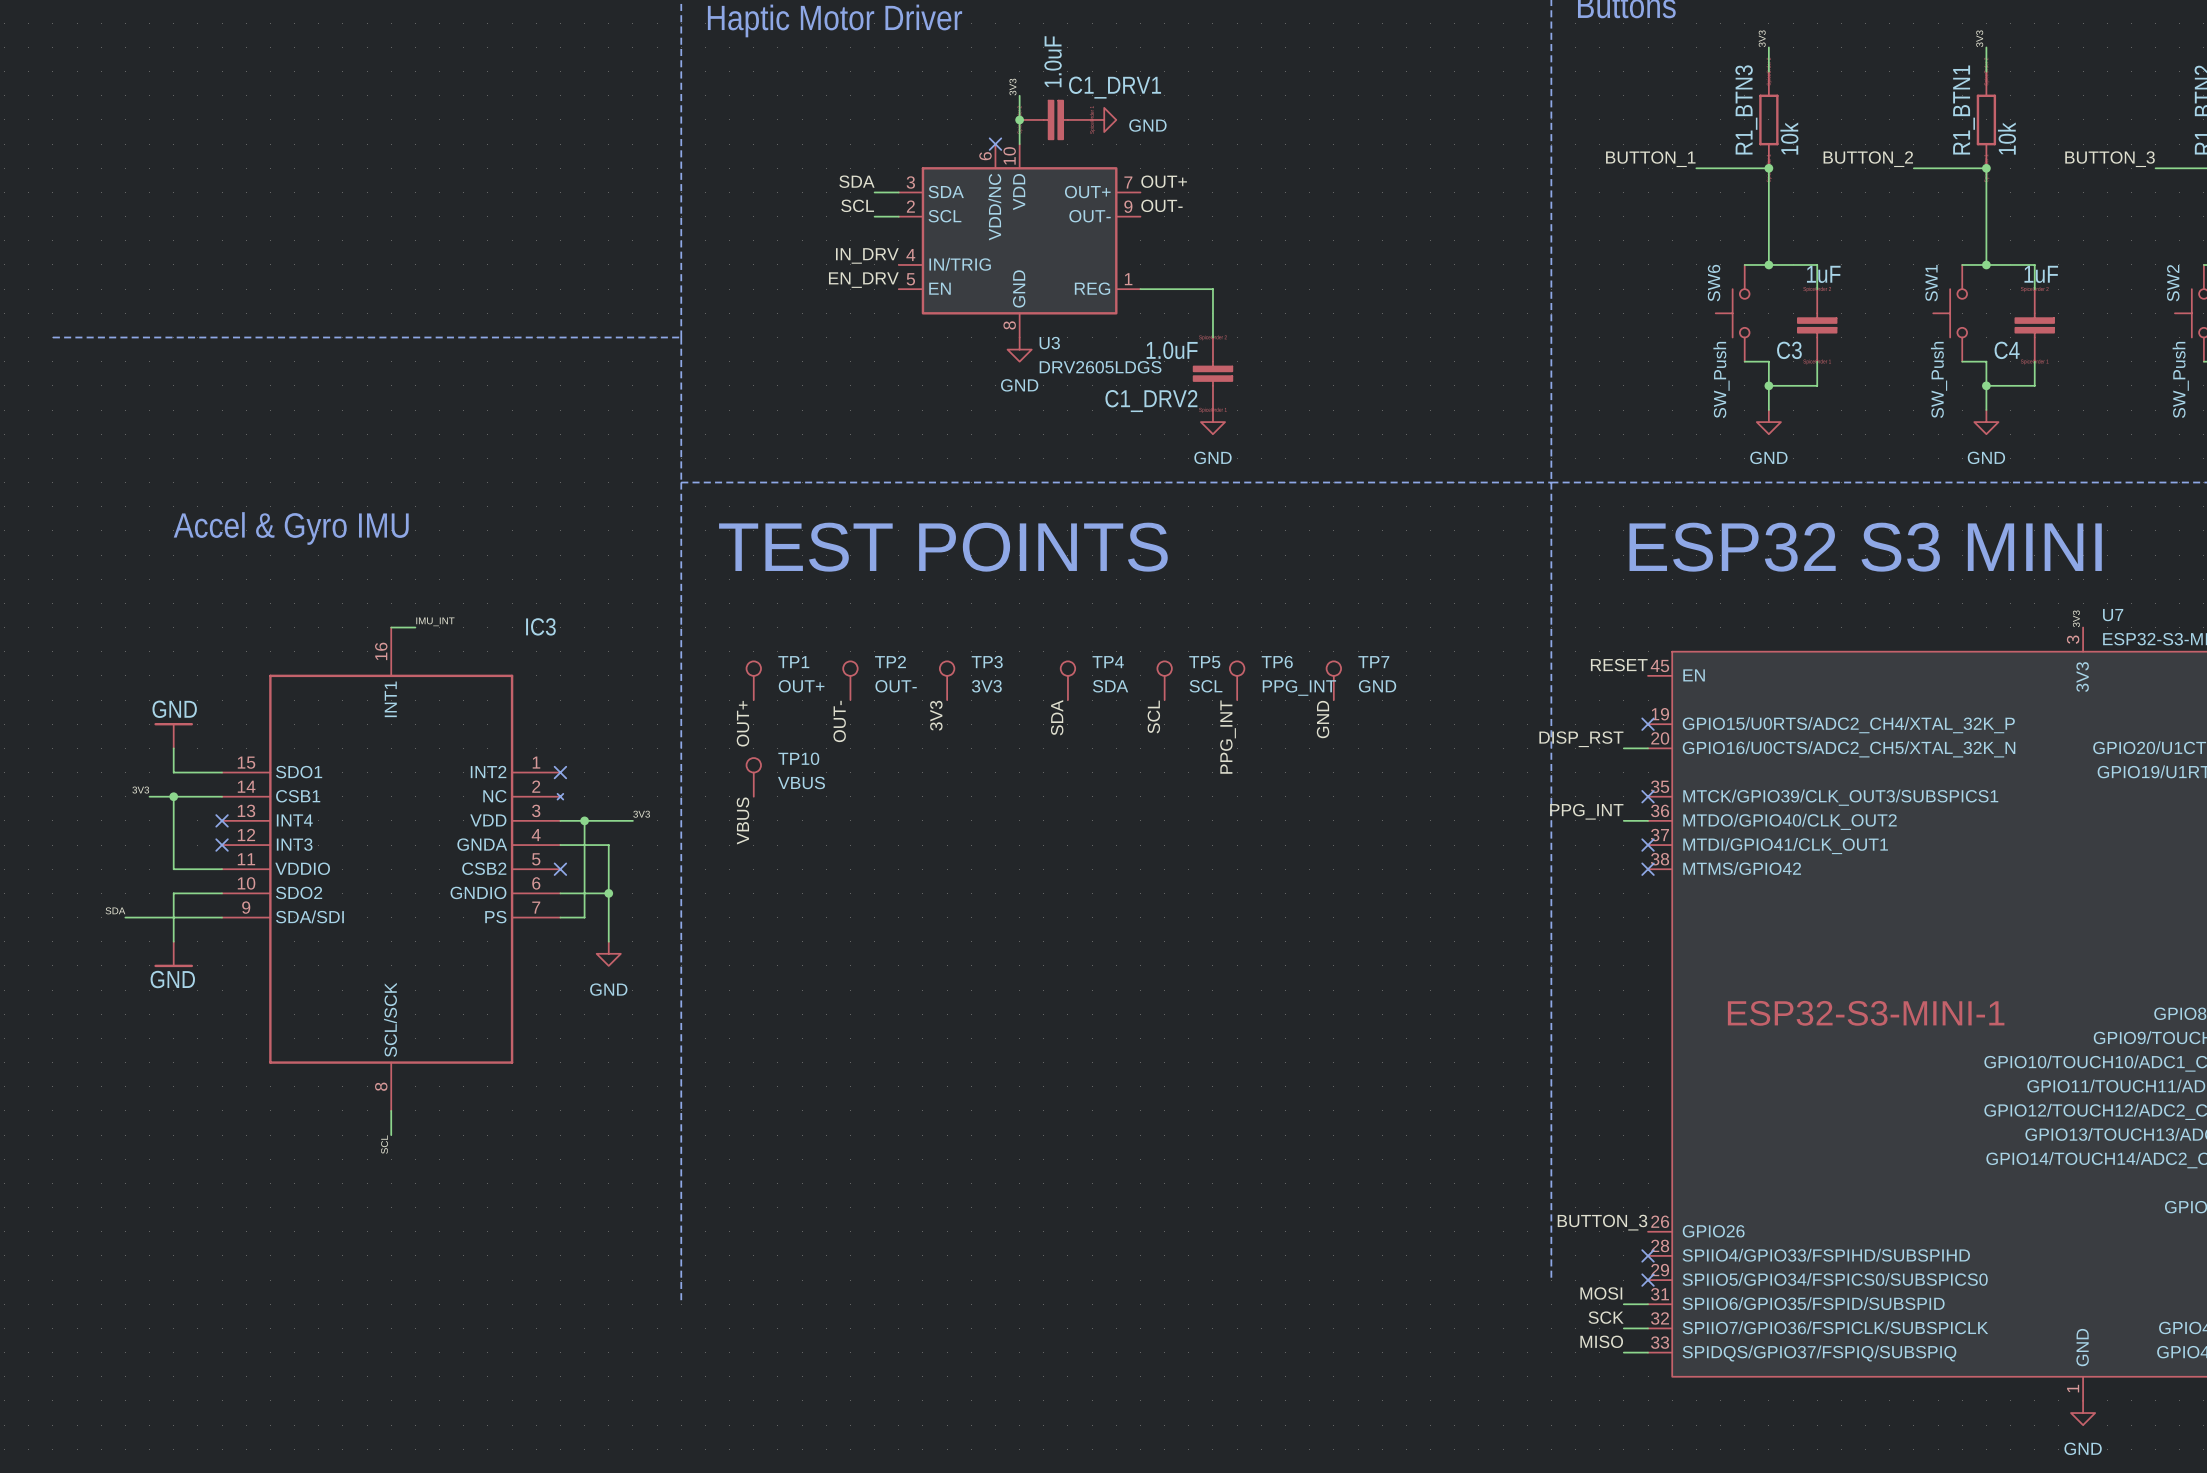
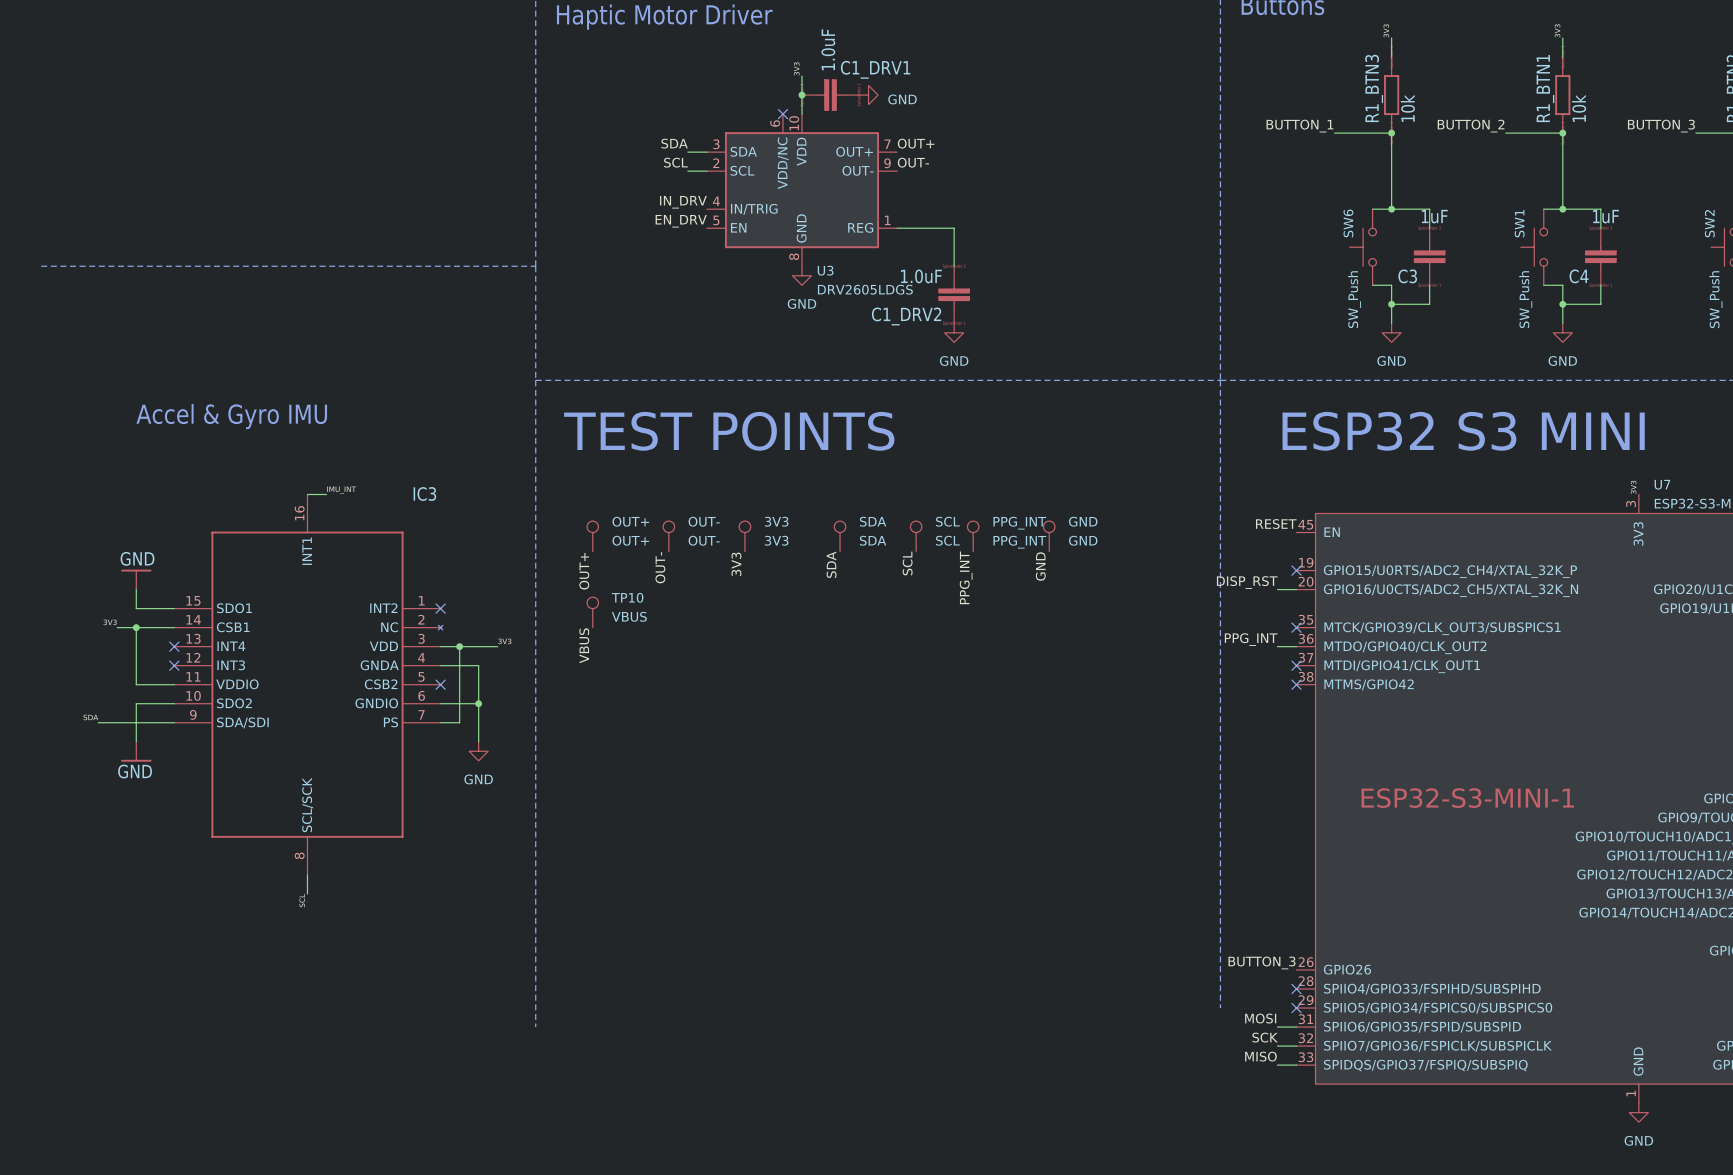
TP1 name: TP1 (793, 662) -> OUT+ (630, 521)
TP2 name: TP2 (890, 662) -> OUT- (704, 521)
TP3 name: TP3 (987, 662) -> 3V3 (776, 521)
TP4 name: TP4 (1108, 662) -> SDA (873, 521)
TP5 name: TP5 (1204, 662) -> SCL (947, 521)
TP6 name: TP6 (1277, 662) -> PPG_INT (1019, 523)
TP7 name: TP7 (1373, 662) -> GND (1083, 521)

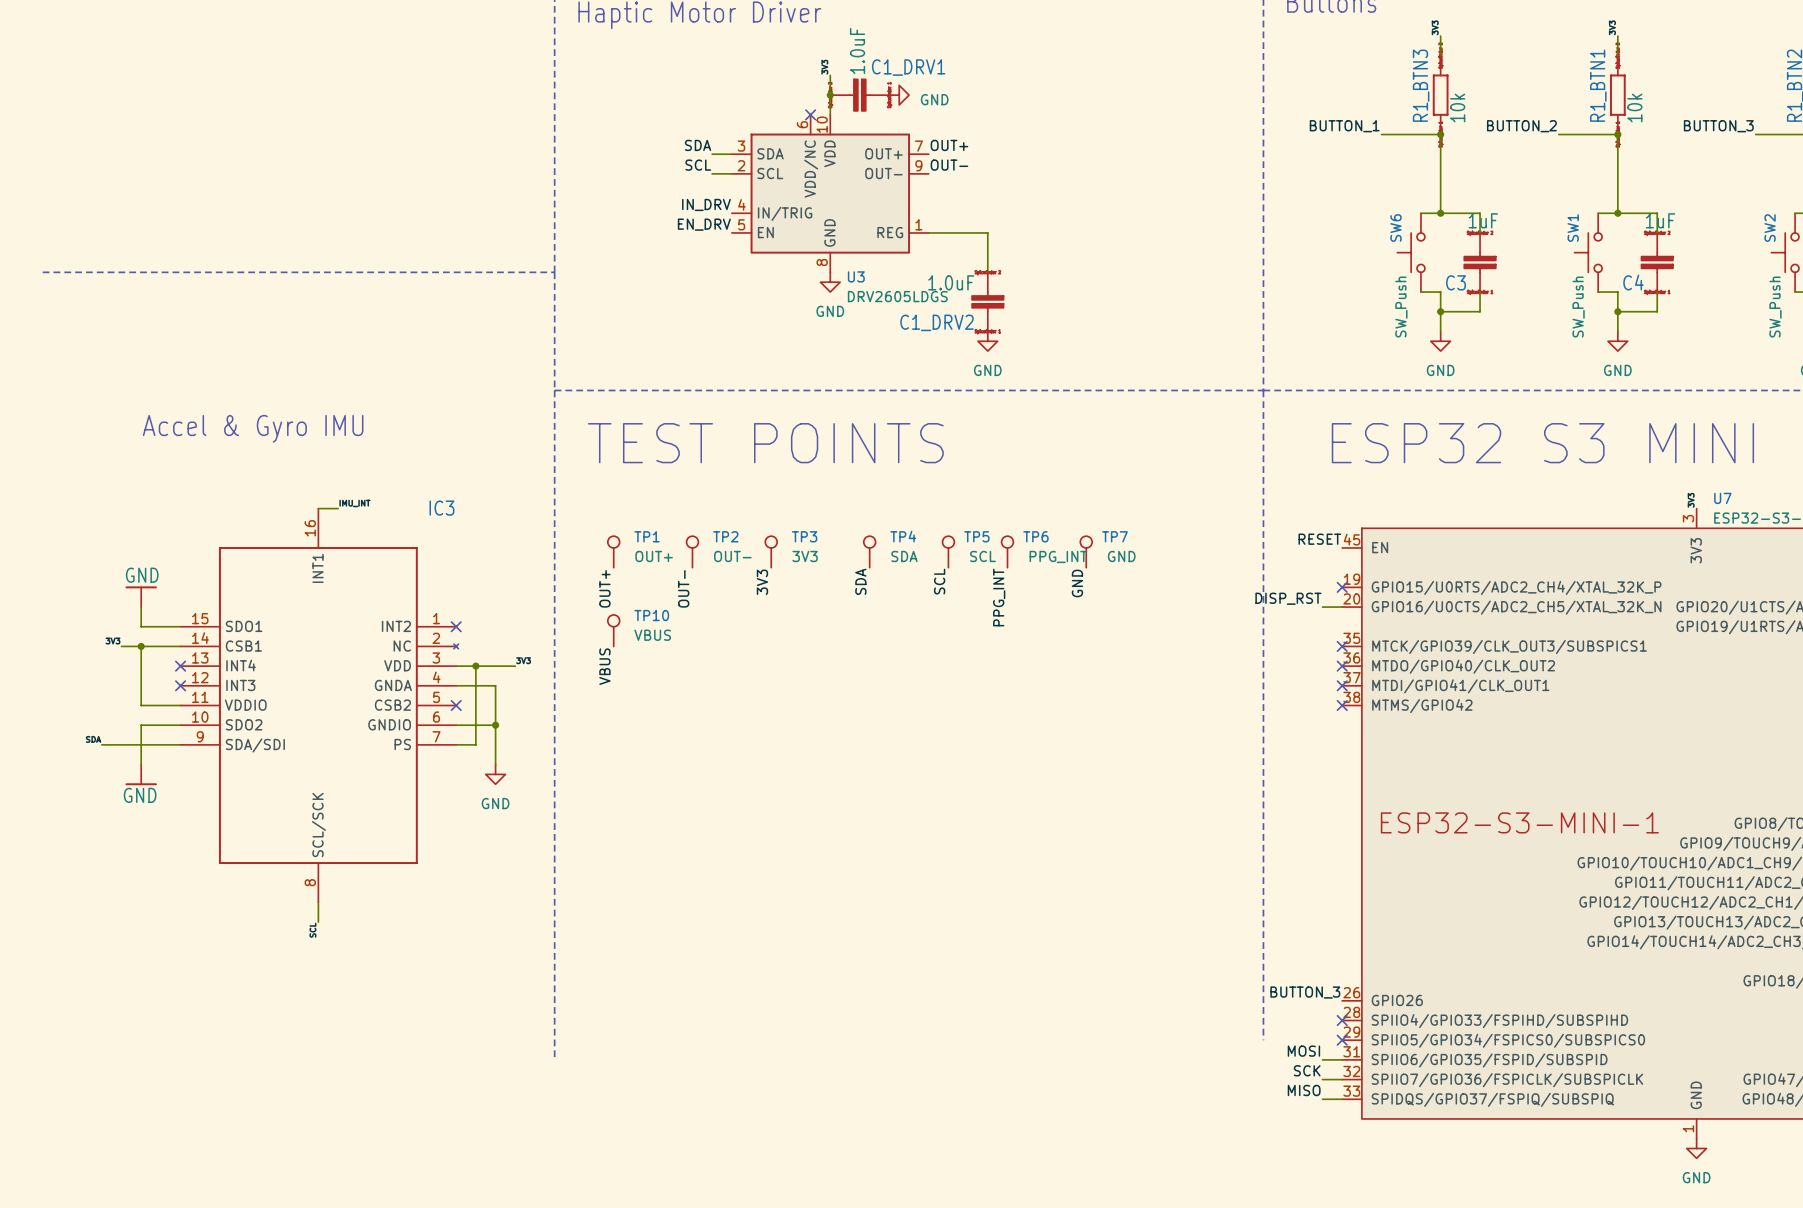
OUT+ name: OUT+ (630, 521) -> TP1 (647, 536)
OUT- name: OUT- (704, 521) -> TP2 (725, 536)
3V3 name: 3V3 (776, 521) -> TP3 (804, 536)
SDA name: SDA (873, 521) -> TP4 (903, 536)
SCL name: SCL (947, 521) -> TP5 (976, 536)
GND name: GND (1083, 521) -> TP7 (1114, 536)
PPG_INT name: PPG_INT (1019, 523) -> TP6 (1035, 536)
label: PPG_INT (1251, 639) -> none
wire: (1277, 646) (1296, 646) -> none
no-connect mark: none -> (1342, 666)

